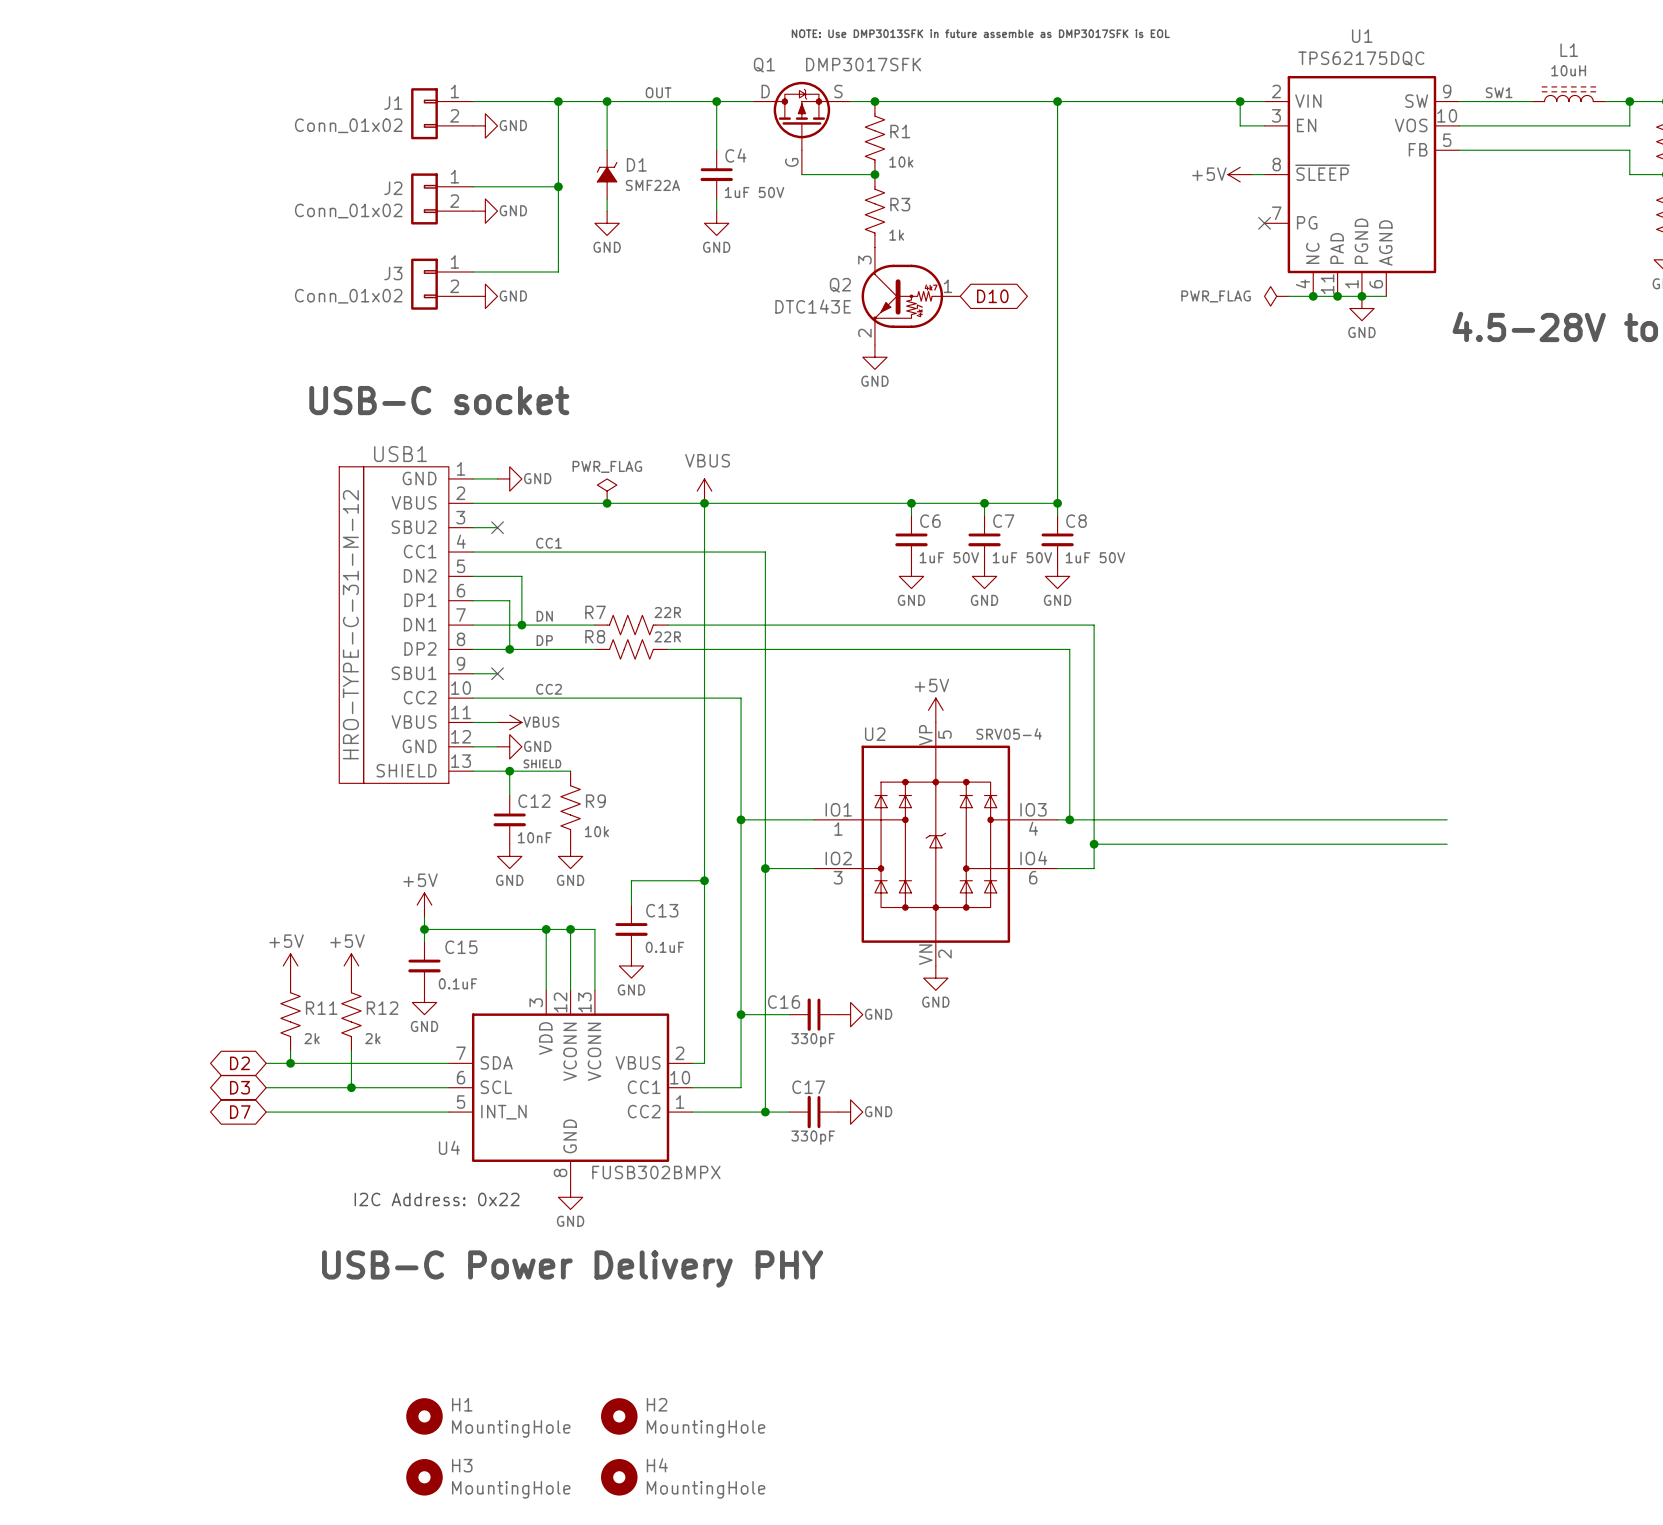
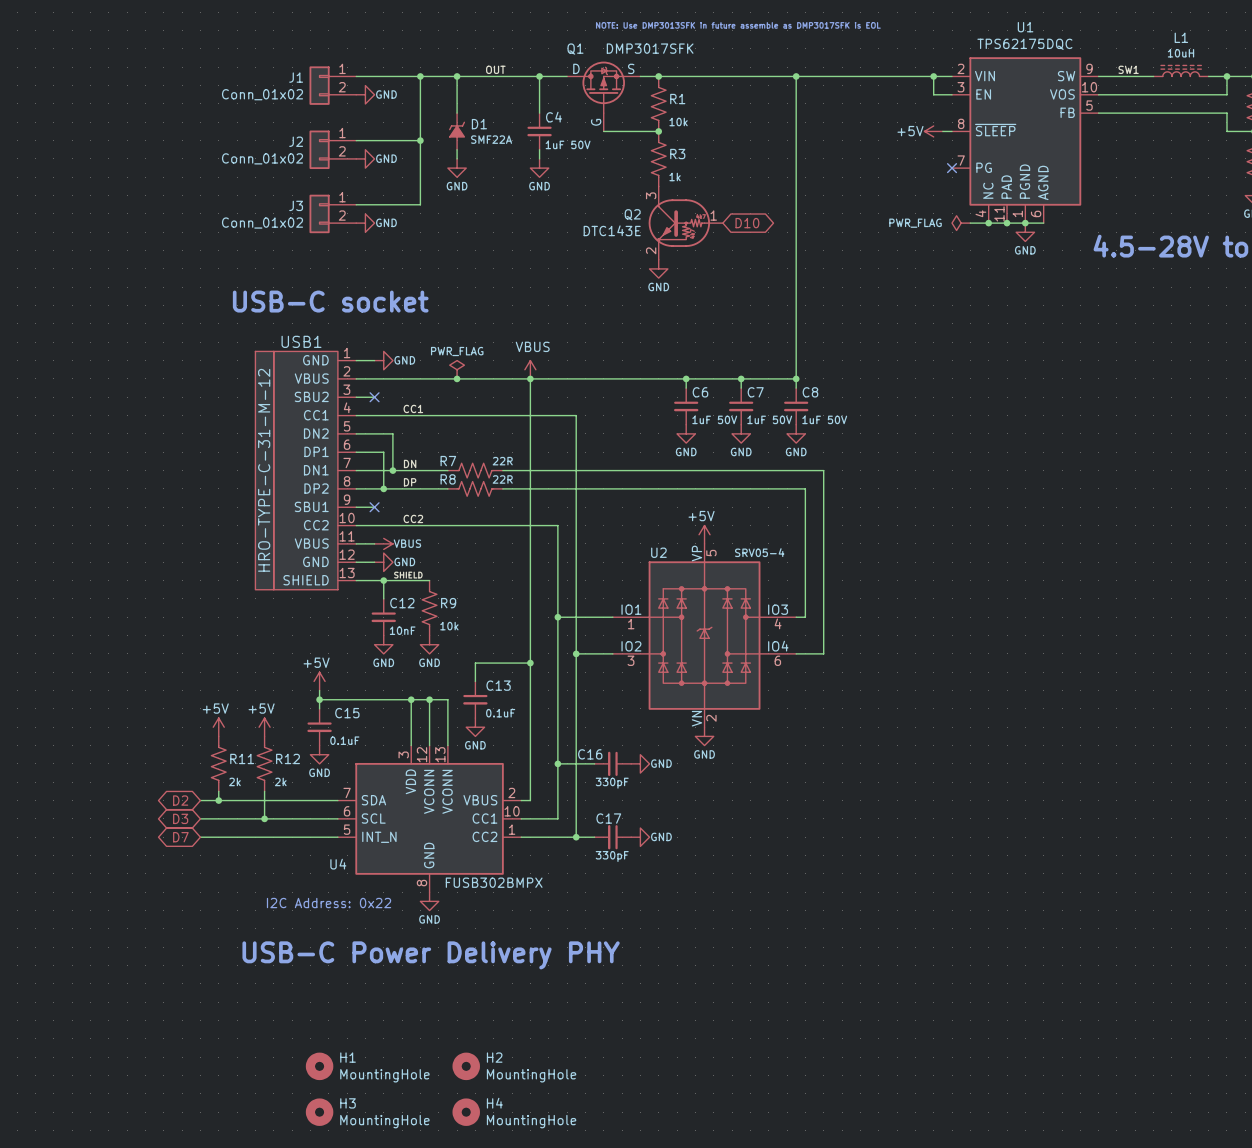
wire: (1069, 819) (1447, 819) -> none
junction: (1069, 819) -> none
wire: (1094, 844) (1447, 844) -> none
junction: (1094, 844) -> none

